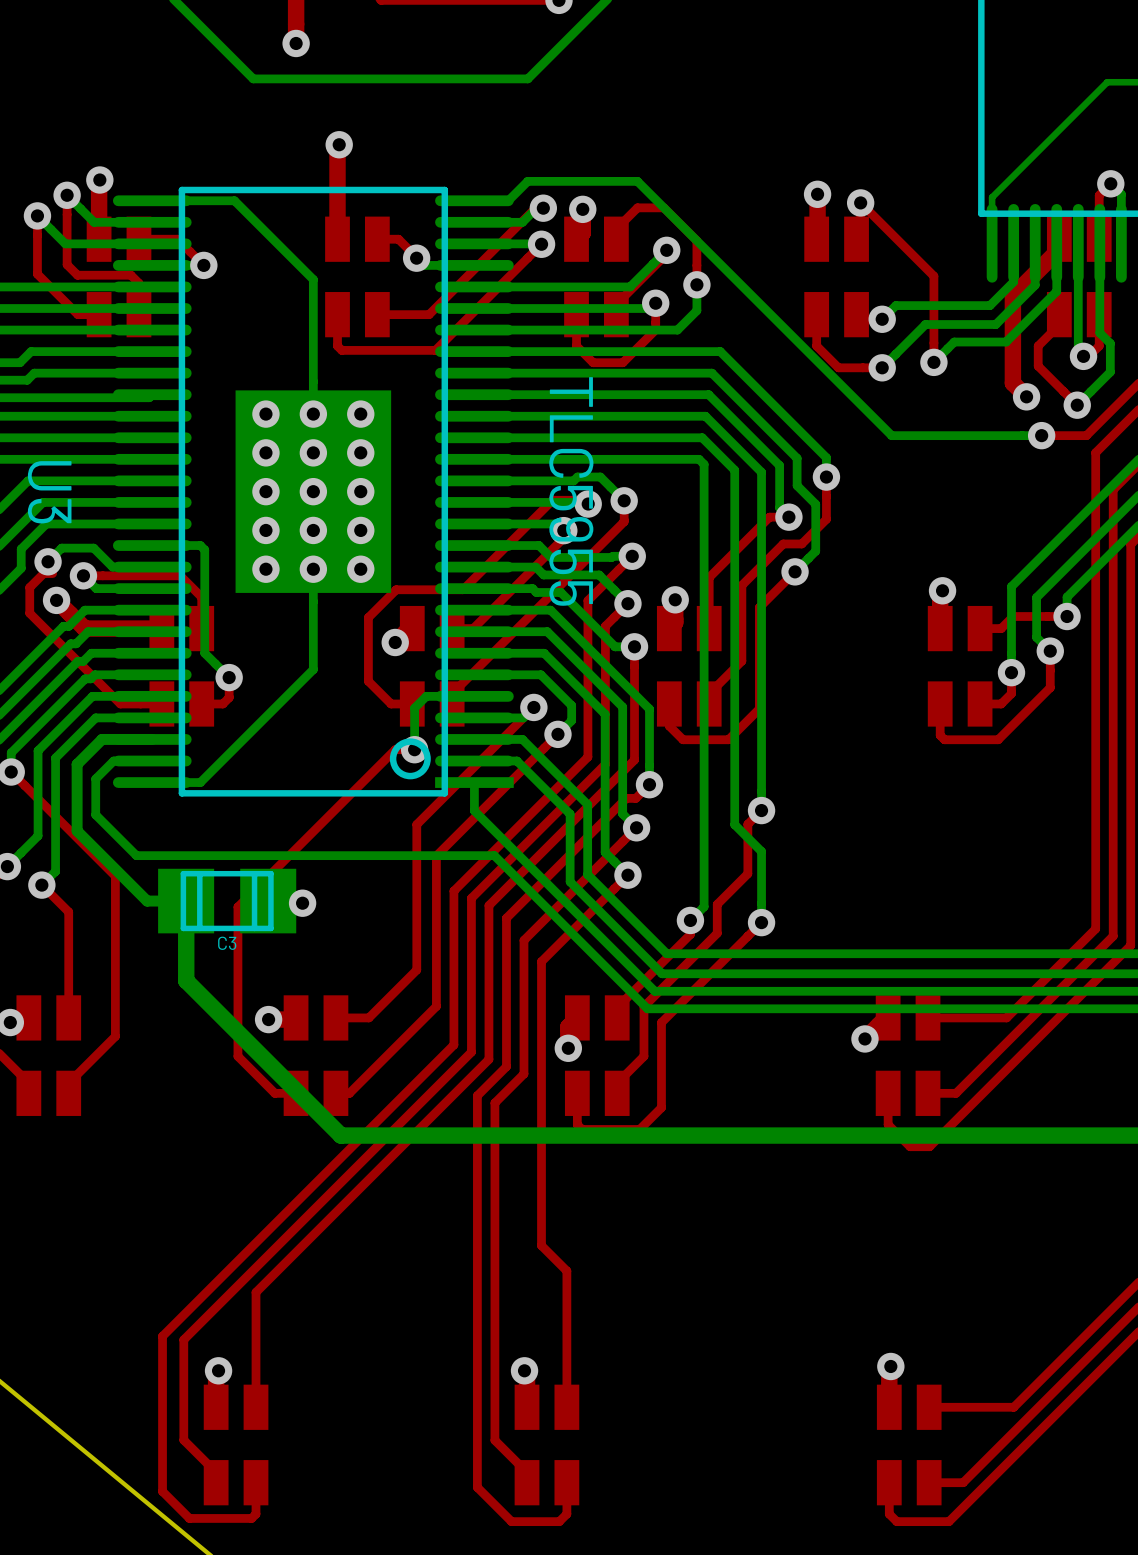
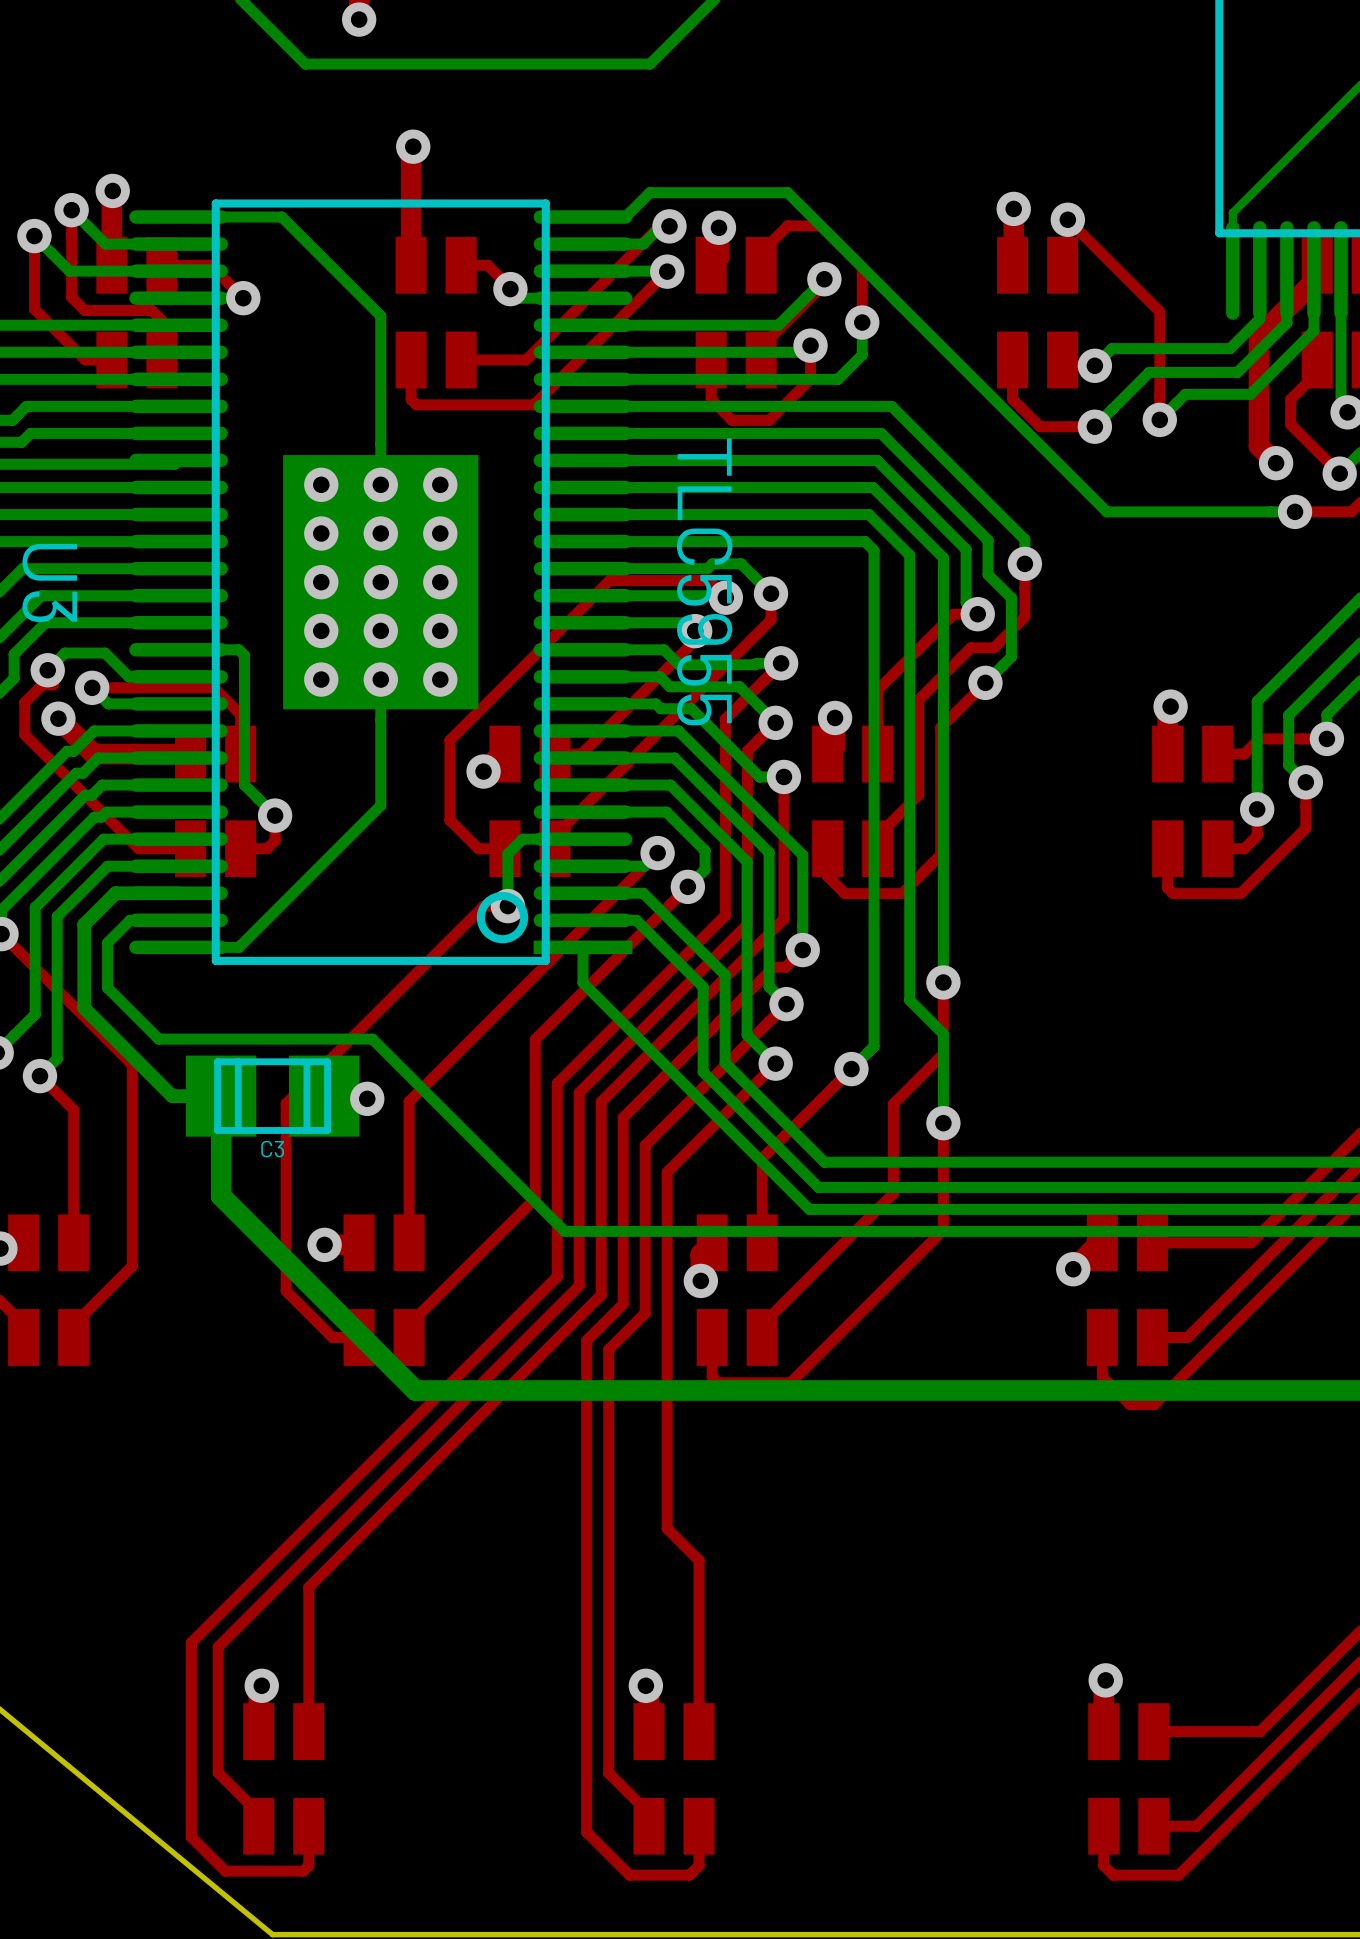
bottom track: (704, 464) (704, 906) (690, 920) -> (871, 547) (874, 550) (874, 1046) (851, 1069)
top track: (584, 500) (552, 500) (463, 589) (396, 589) -> (721, 593) (708, 580) (609, 580) (484, 705)
top track: (761, 810) (747, 824) (747, 873) (717, 904) (717, 933) (643, 1006) (643, 1056) -> (943, 982) (943, 1053) (893, 1103) (893, 1193) (795, 1291)
top track: (416, 824) (416, 970) (368, 1017) (335, 1017) -> (510, 1000) (409, 1101) (409, 1242)
bottom track: (306, 855) (494, 855) (647, 1008) -> (372, 1039) (564, 1231) (800, 1231)
top track: (690, 920) (690, 934) (617, 1007) -> (851, 1069) (762, 1158) (762, 1229)
via position: (690, 920) -> (851, 1069)
top track: (761, 922) (661, 1022) (661, 1107) -> (943, 1123) (943, 1229) (817, 1355)
top track: (436, 982) (436, 1006) (349, 1093) (335, 1093) -> (535, 1198) (409, 1324) (409, 1337)

